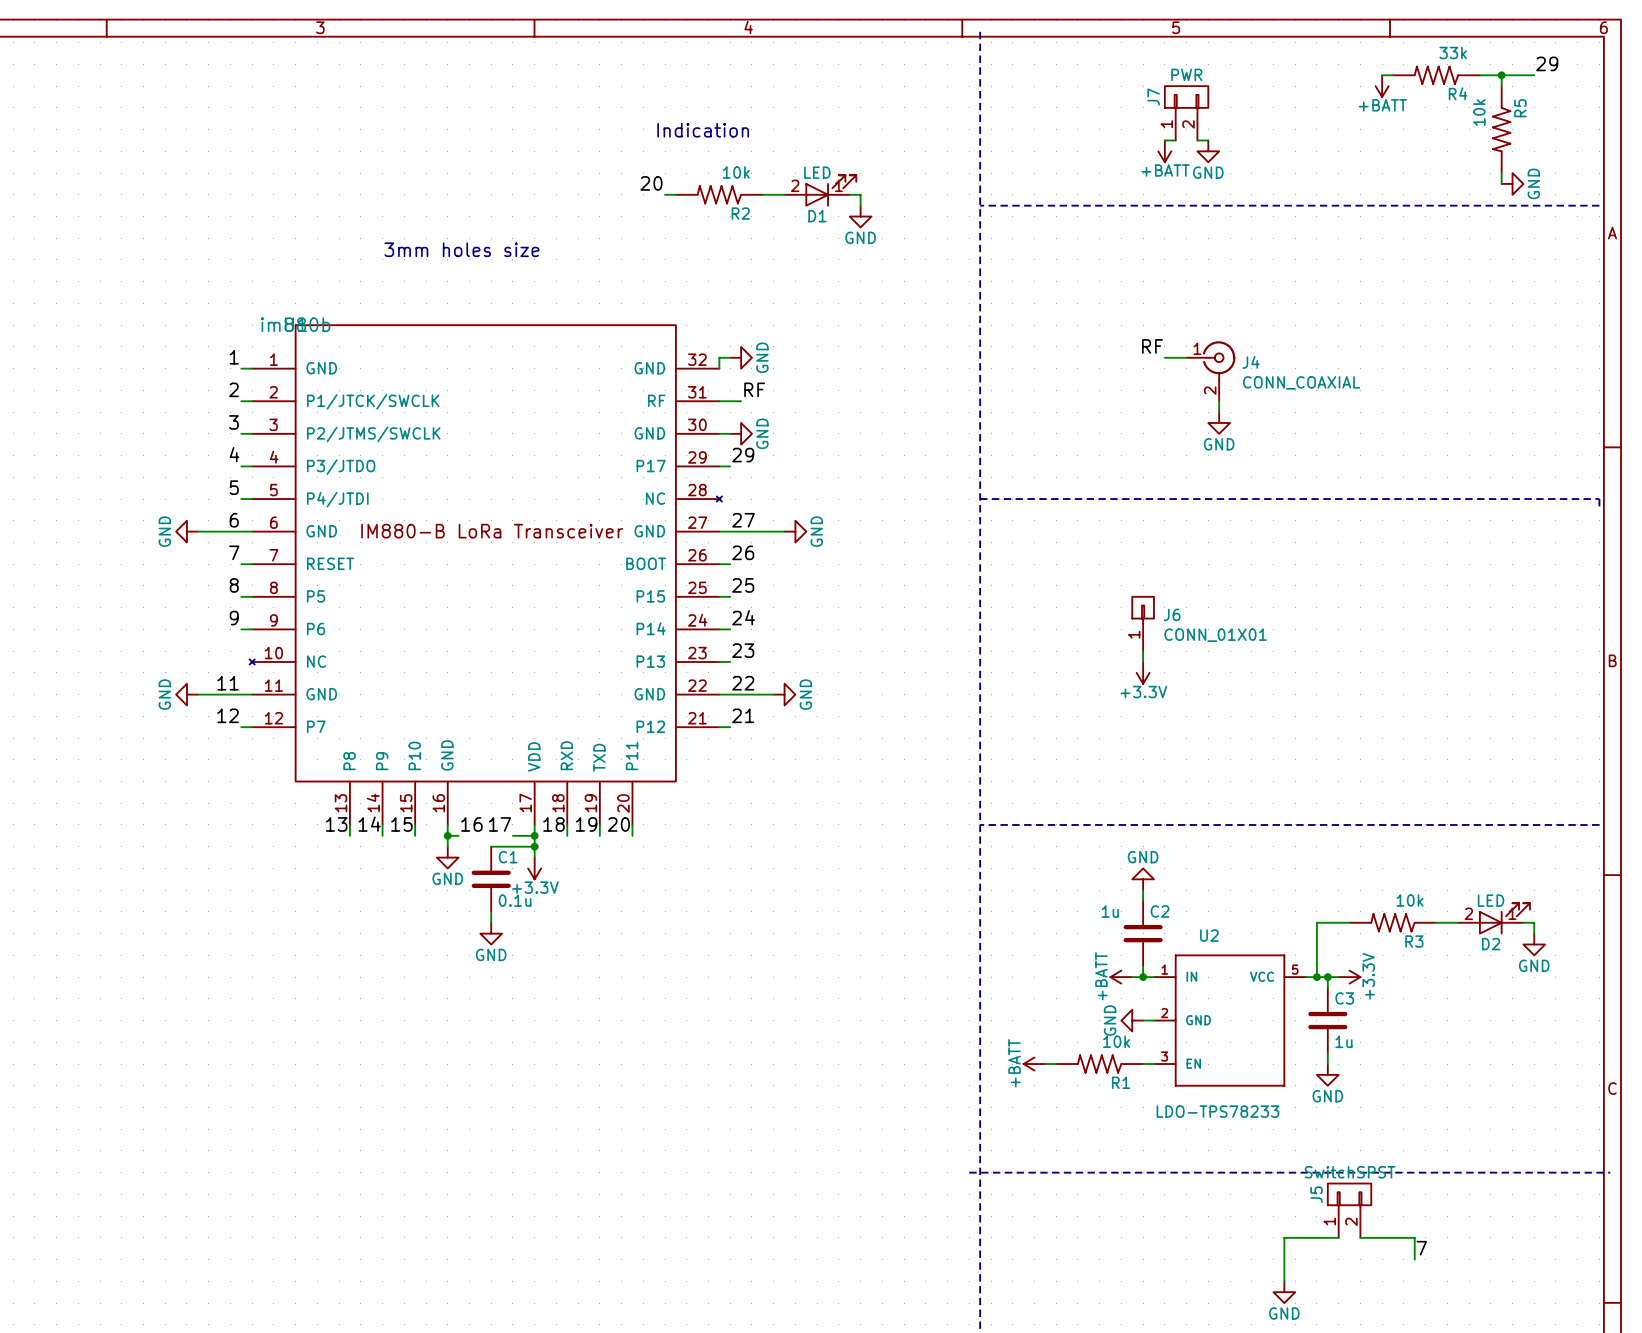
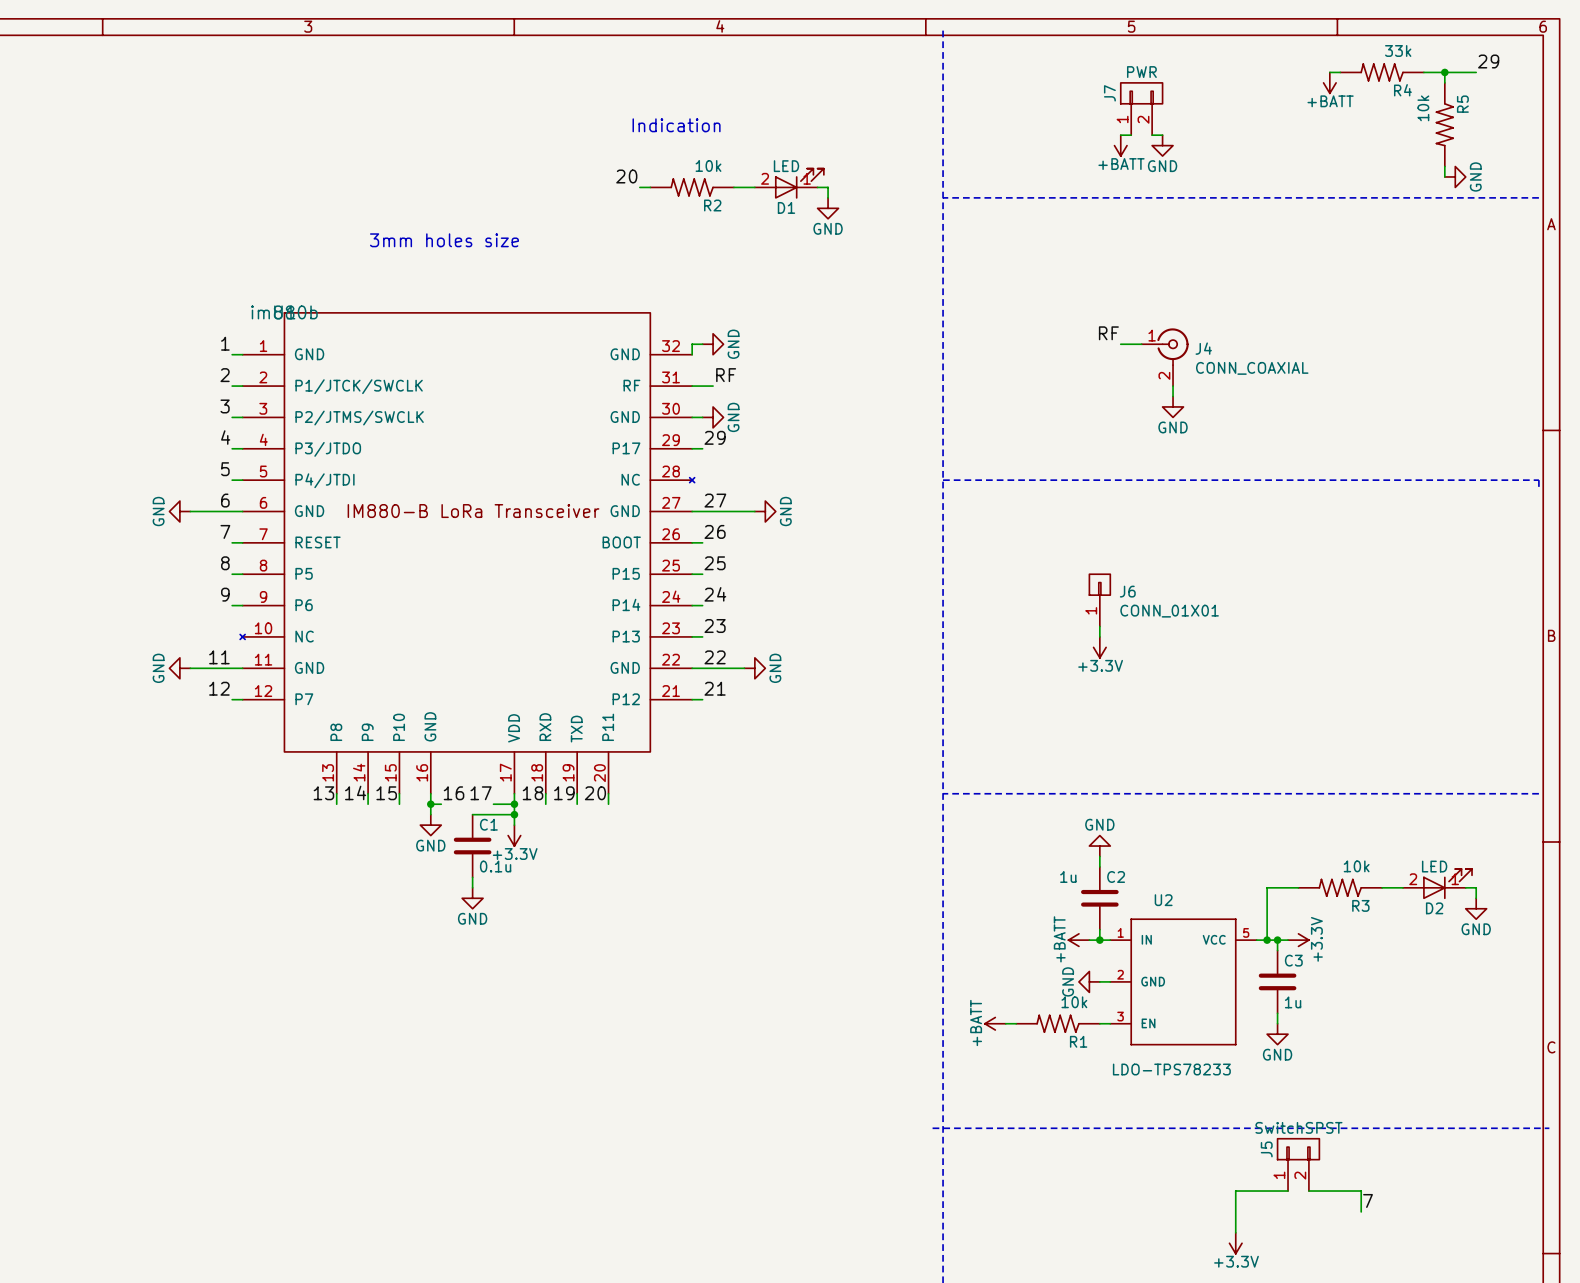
power symbol: GND (1284, 1292) -> +3.3V (1235, 1243)

